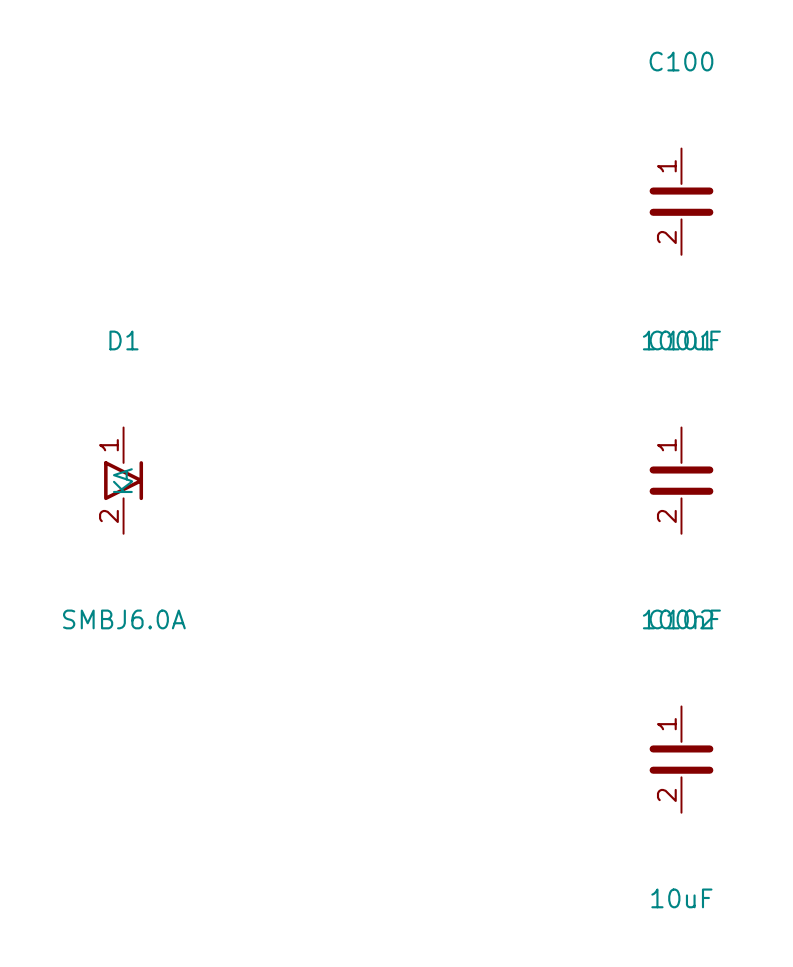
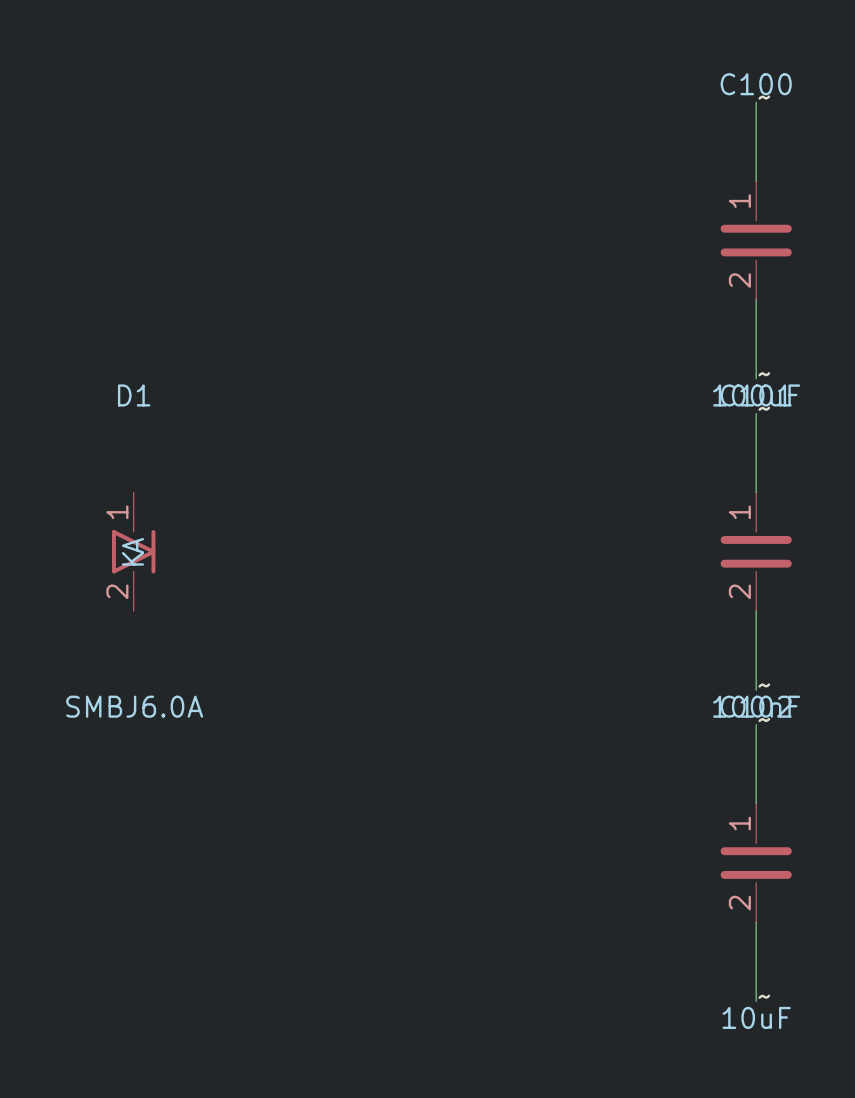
label: none -> ~ (764, 97)
wire: none -> (756, 102) (756, 181)
wire: none -> (756, 299) (756, 378)
label: none -> ~ (764, 374)
label: none -> ~ (764, 408)
wire: none -> (756, 413) (756, 492)
wire: none -> (756, 611) (756, 690)
label: none -> ~ (764, 685)
label: none -> ~ (764, 720)
wire: none -> (756, 724) (756, 803)
wire: none -> (756, 922) (756, 1001)
label: none -> ~ (764, 996)

